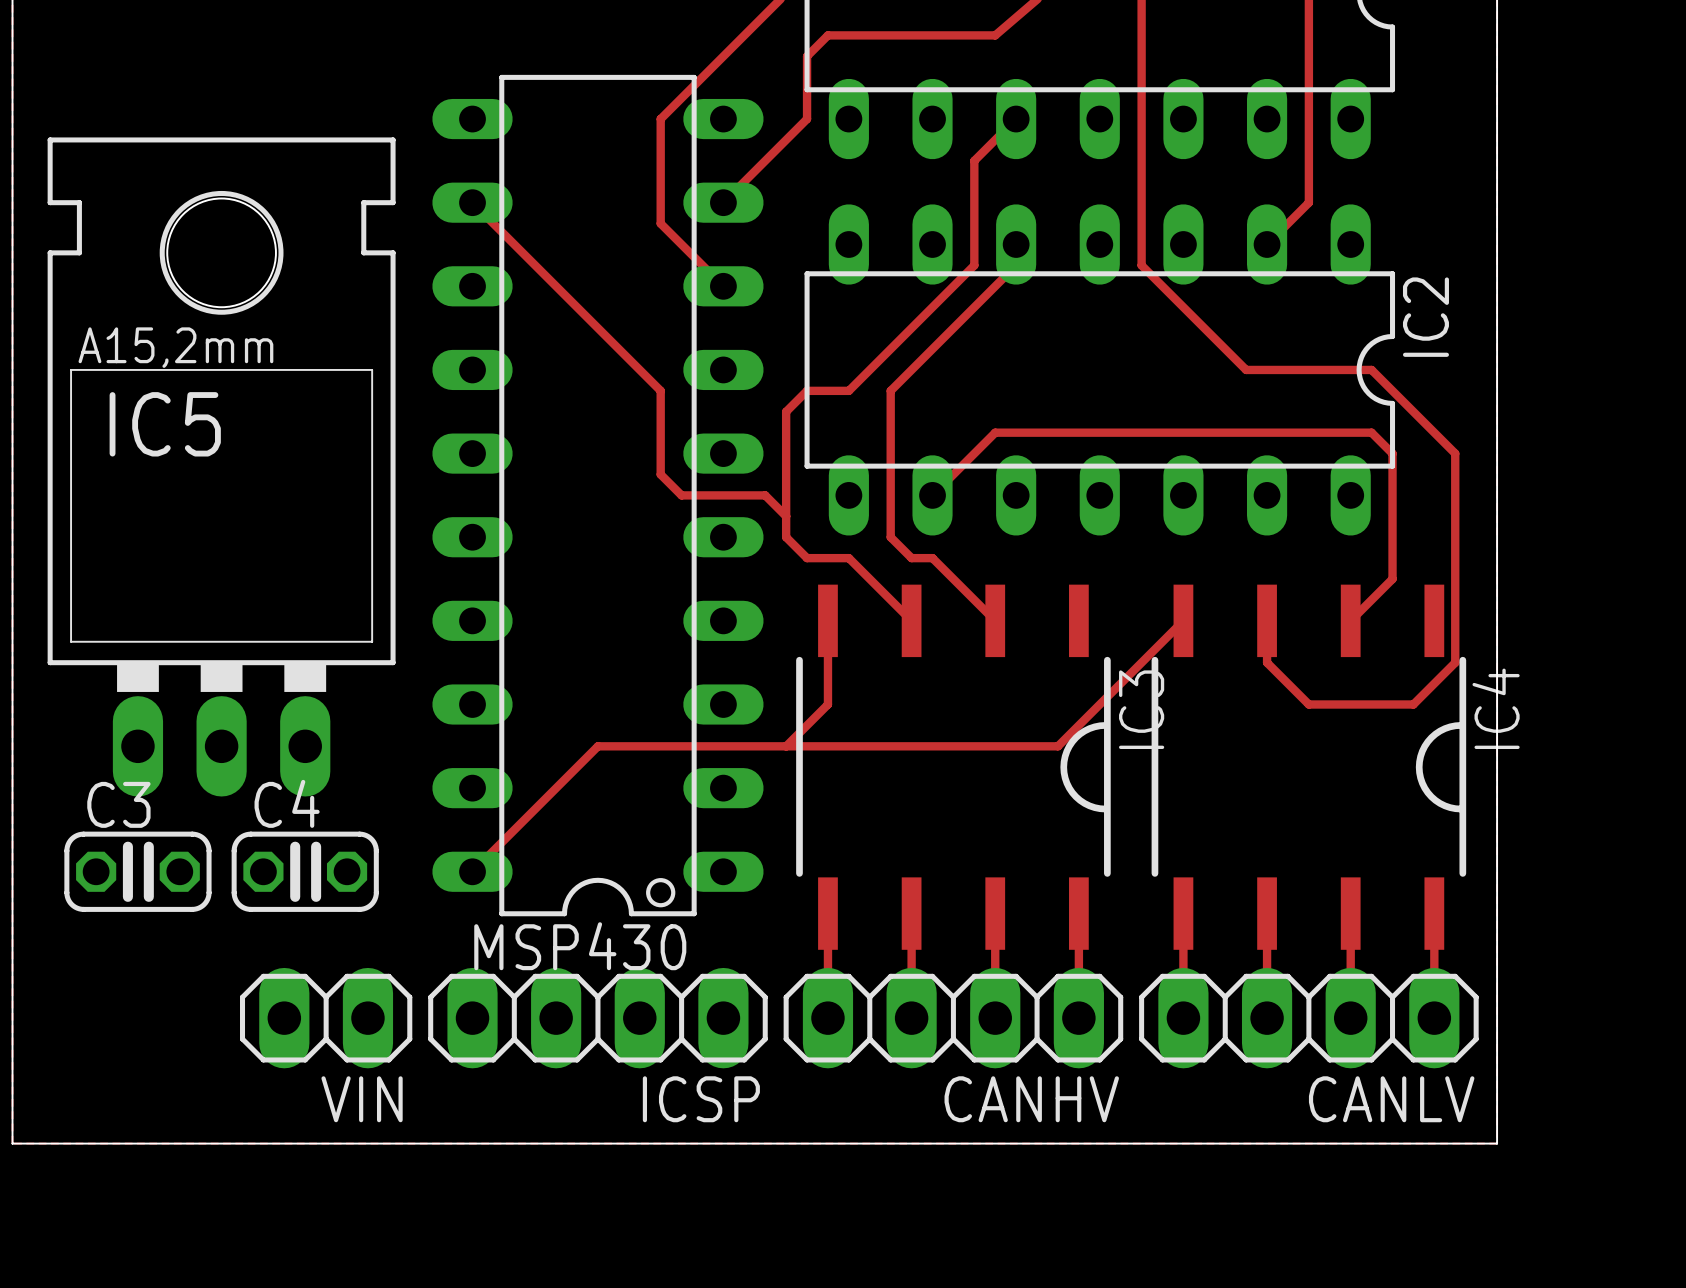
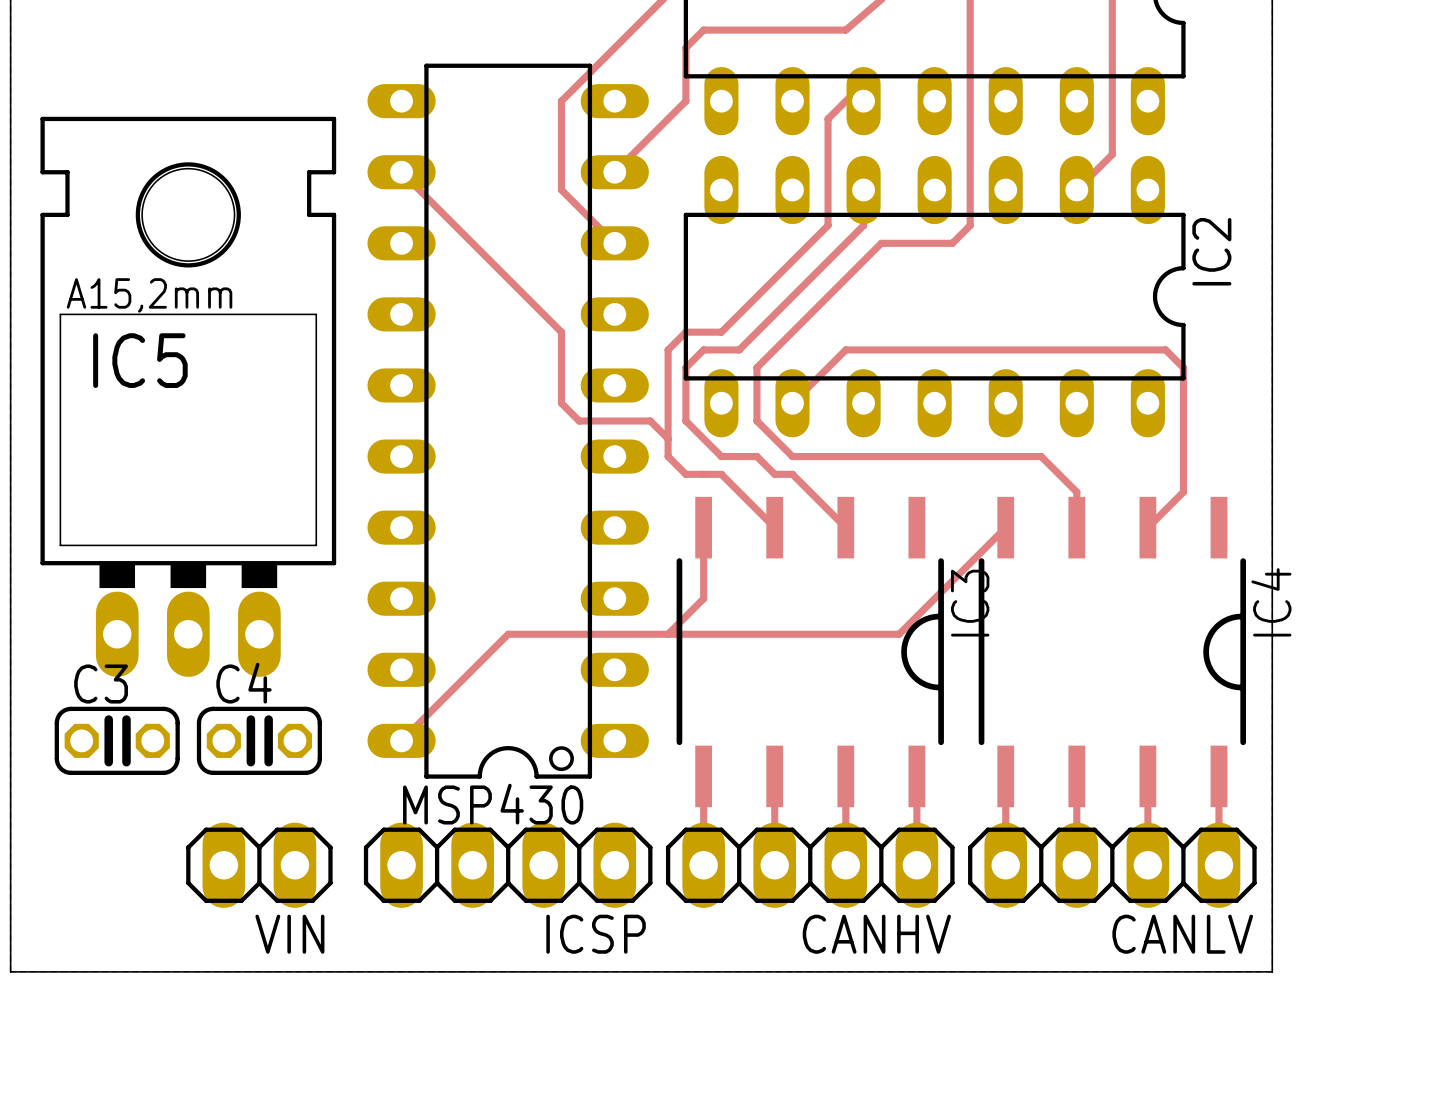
track: (1016, 119) (974, 160) -> (863, 83) (828, 118) (828, 136)
track: (1308, 181) (1308, 202) (1267, 244) -> (1112, 154) (1076, 190)
track: (1141, 265) (1246, 369) (1371, 369) (1455, 453) (1455, 662) (1413, 704) (1308, 704) (1267, 662) (1267, 620) -> (756, 421) (792, 456) (1041, 456) (1076, 492) (1076, 527)
track: none -> (970, 225) (952, 243) (881, 243) (756, 367)
IC2 position: (1099, 369) -> (934, 296)
track: (890, 390) (890, 432) -> (756, 332) (739, 349) (703, 349) (685, 367) (685, 421) (721, 456) (756, 456)
track: (1392, 453) (1371, 432) (995, 432) (932, 495) -> (1183, 385) (1183, 367) (1165, 349) (845, 349) (792, 403)
track: (890, 495) (890, 537) -> none
VIN position: (326, 1018) -> (259, 865)

